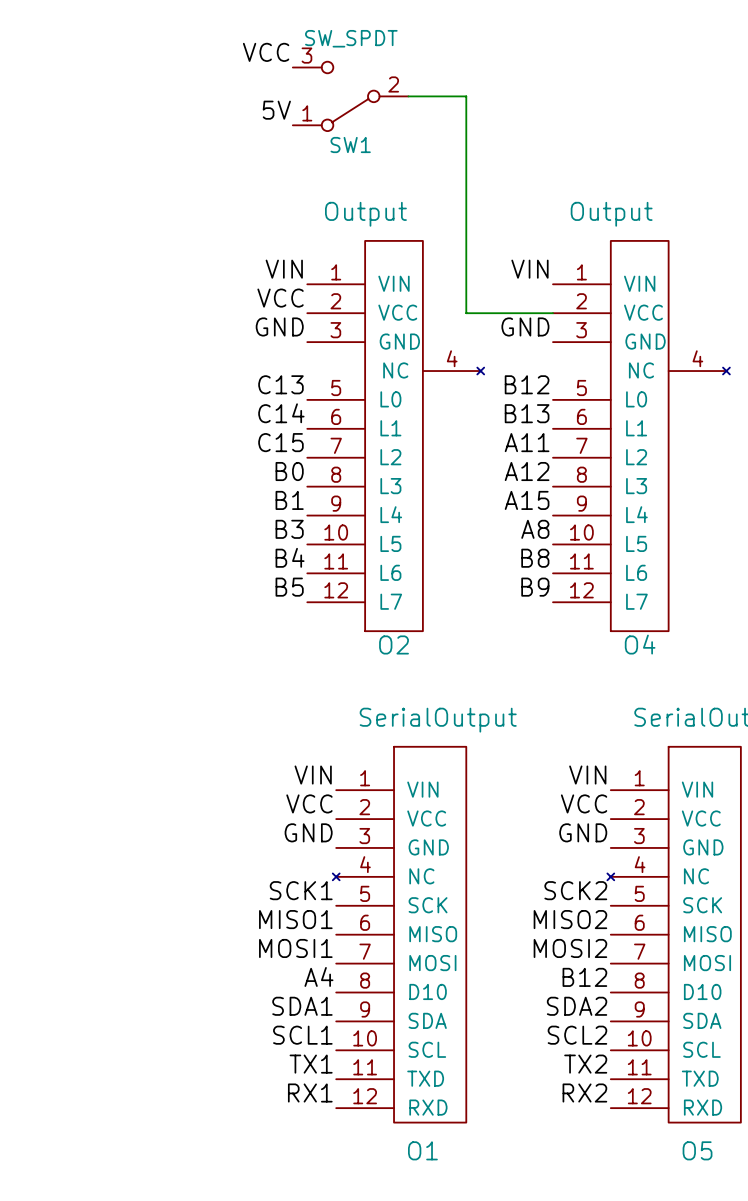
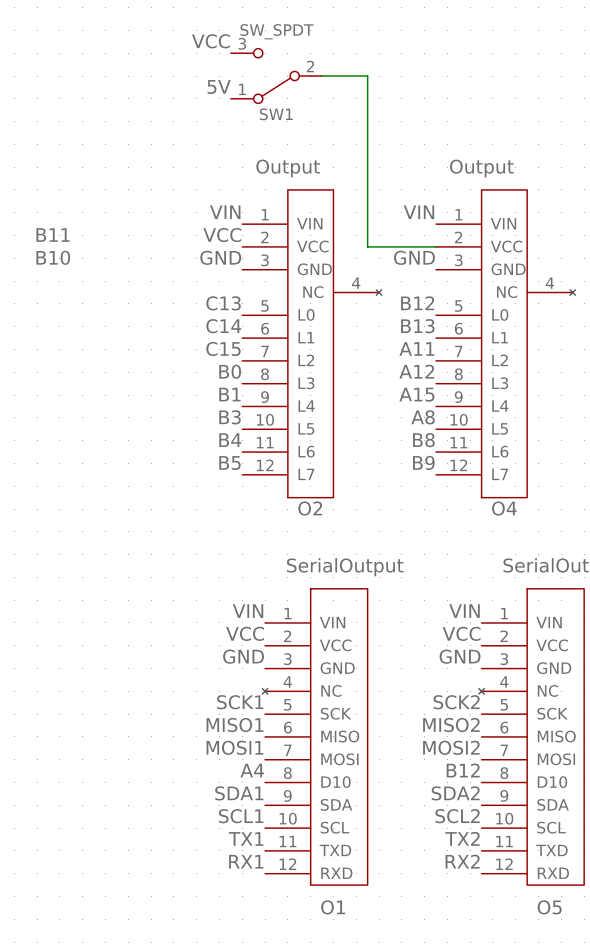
label: none -> B11 (53, 235)
label: none -> B10 (53, 257)

